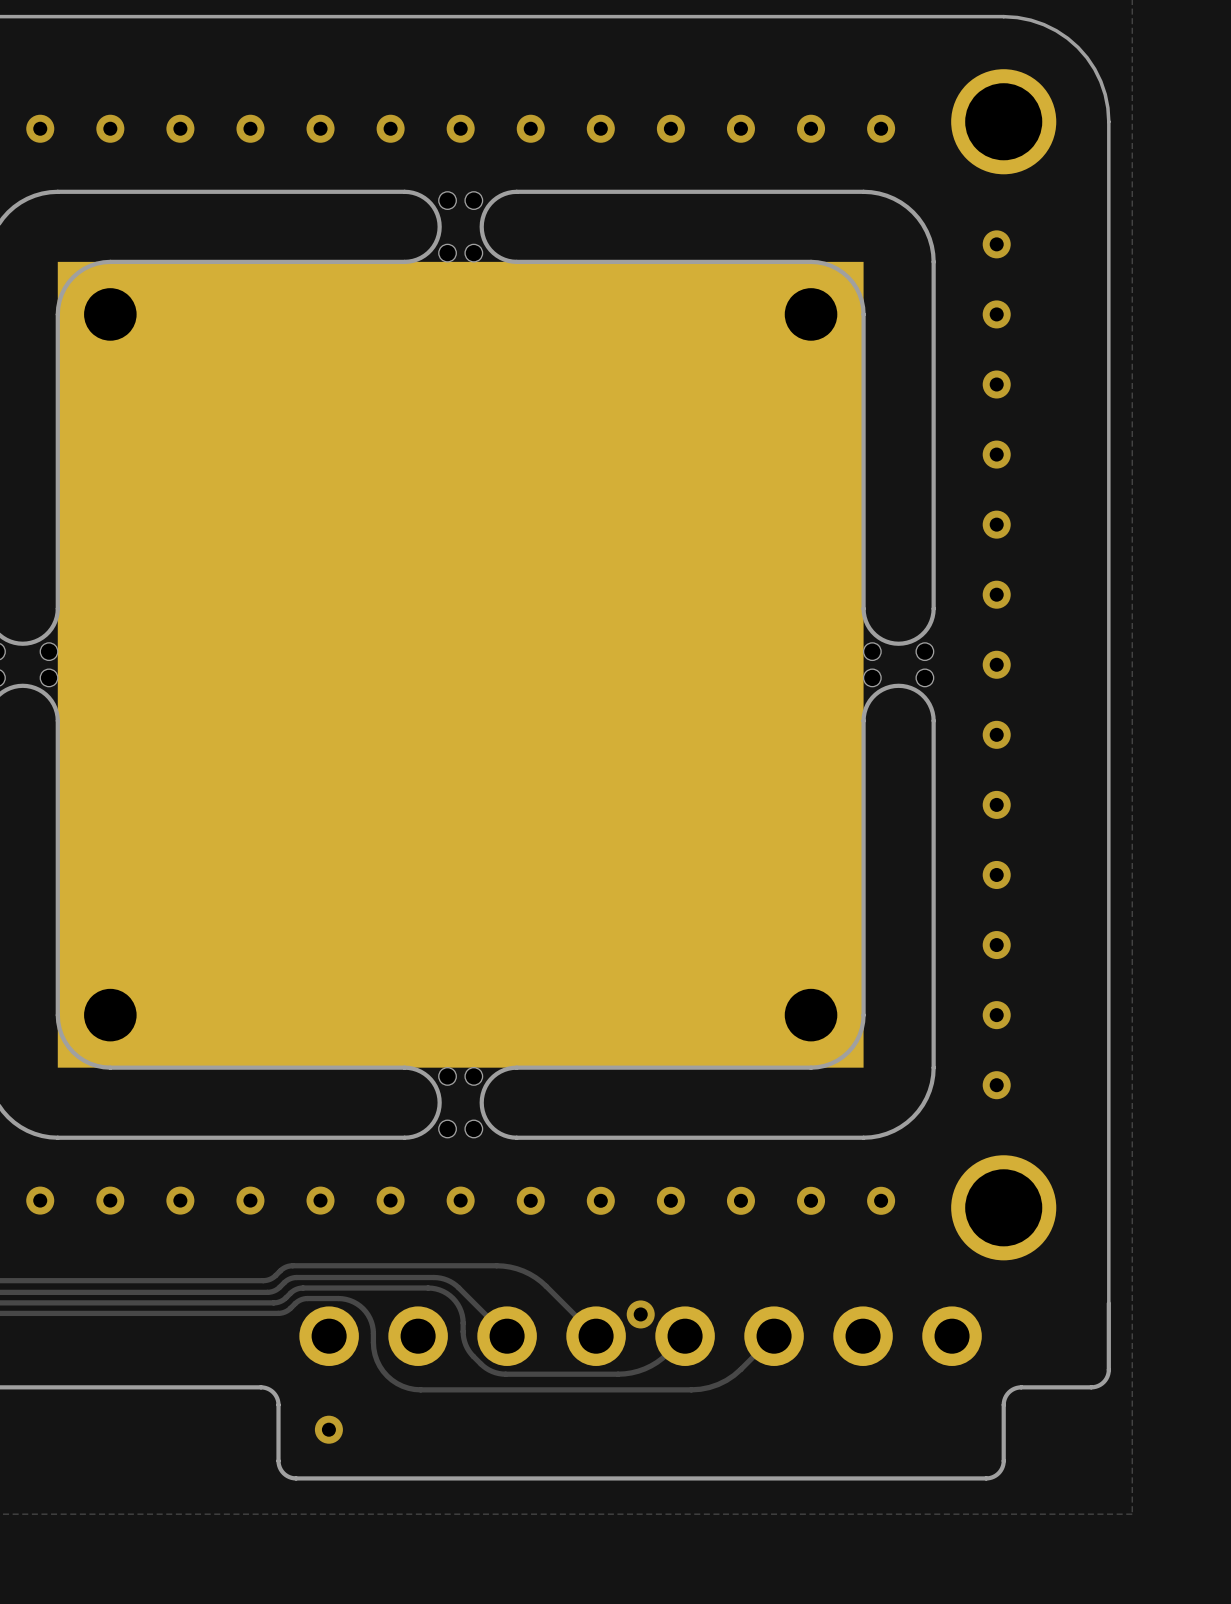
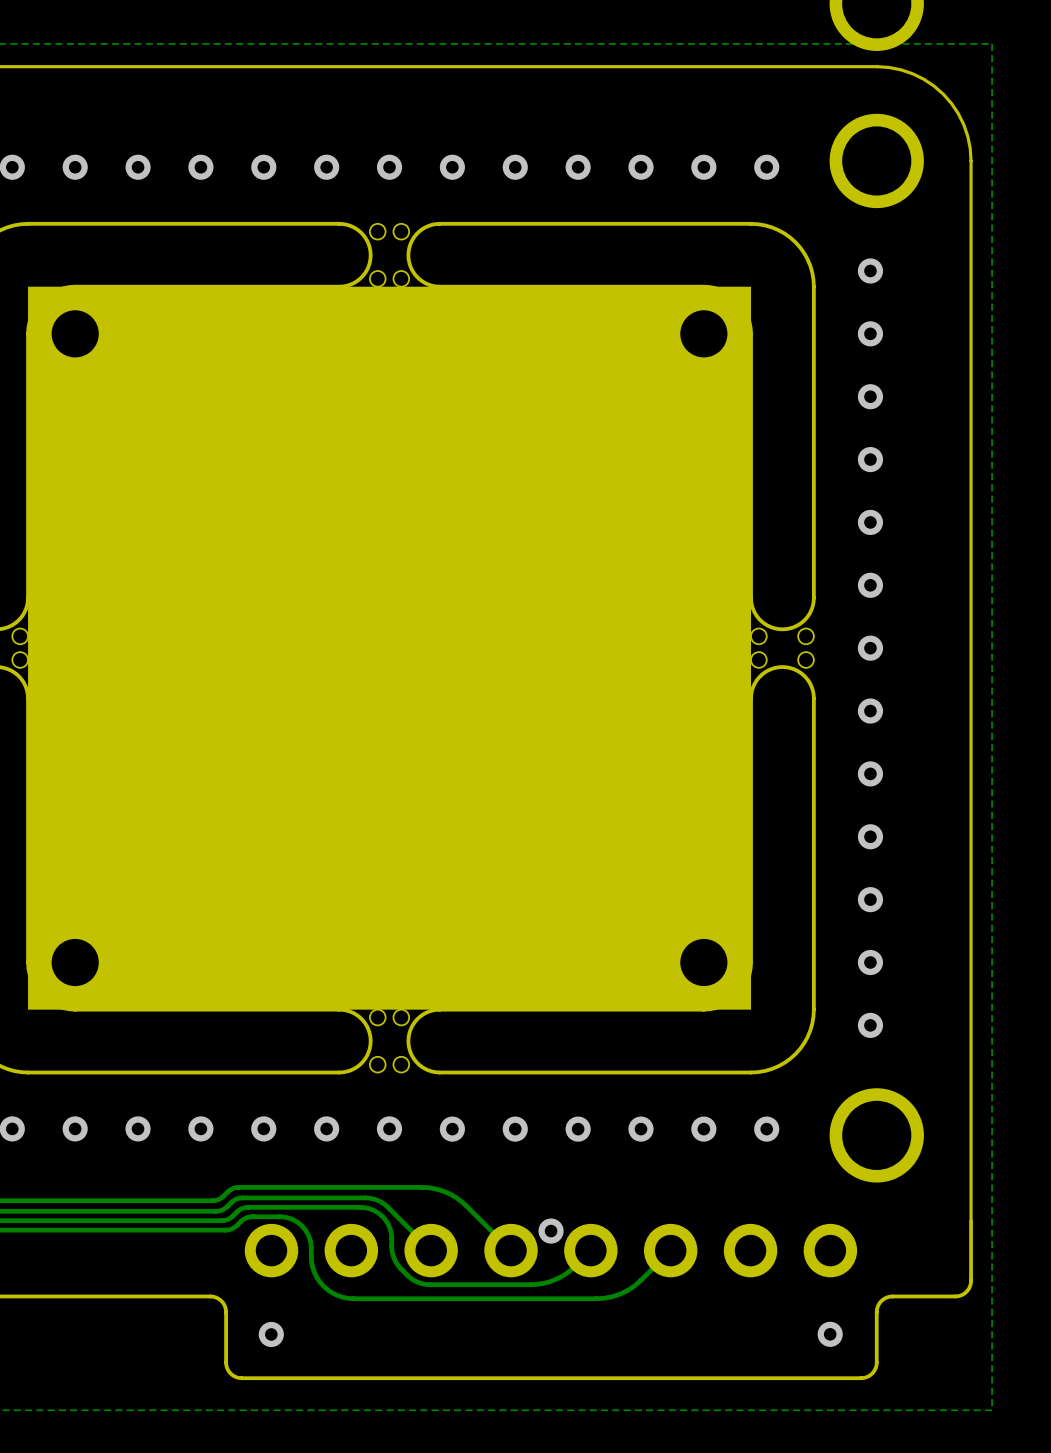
via: none -> (830, 1334)

